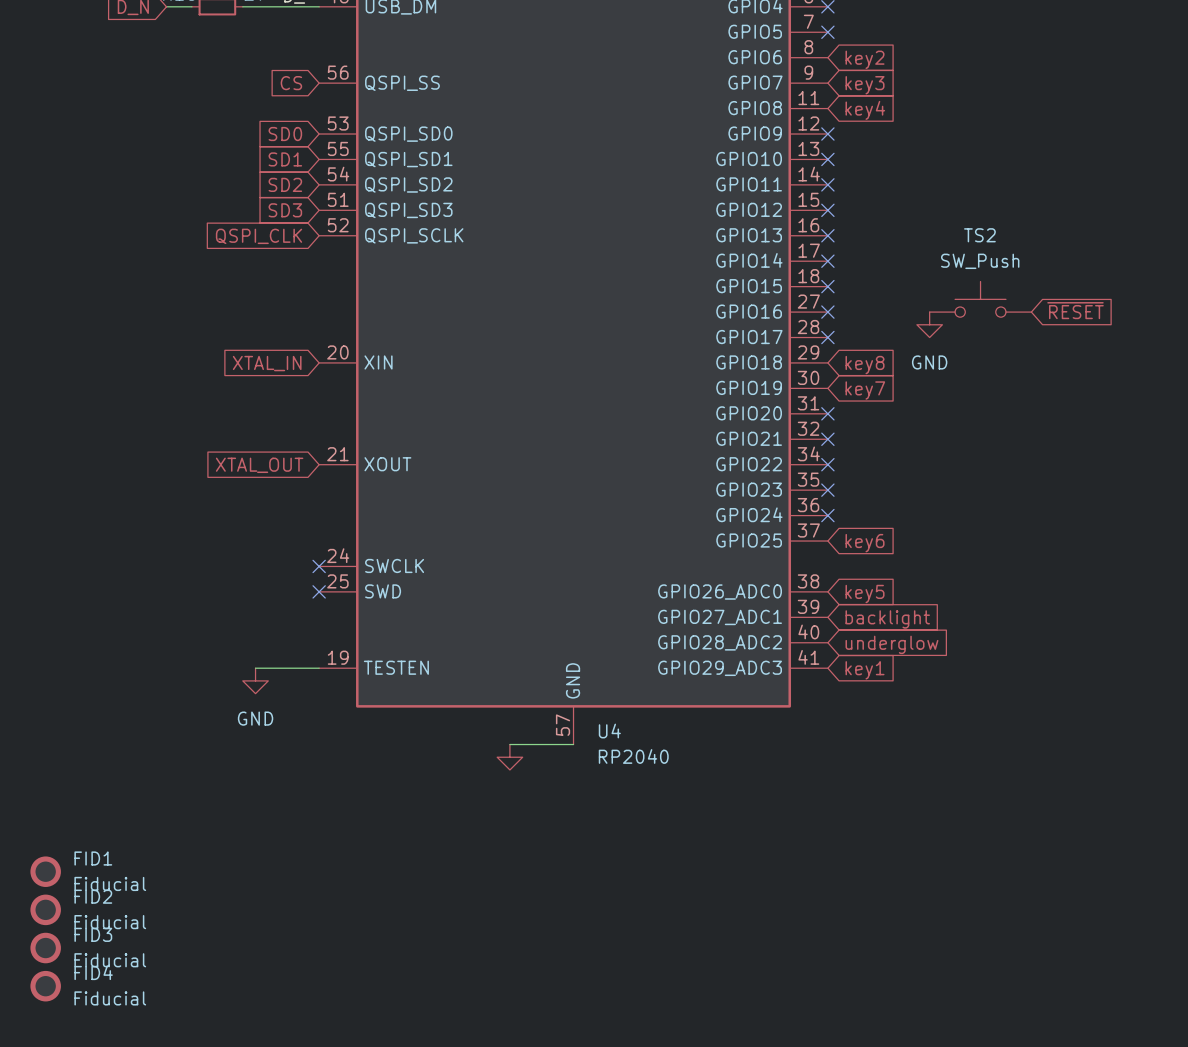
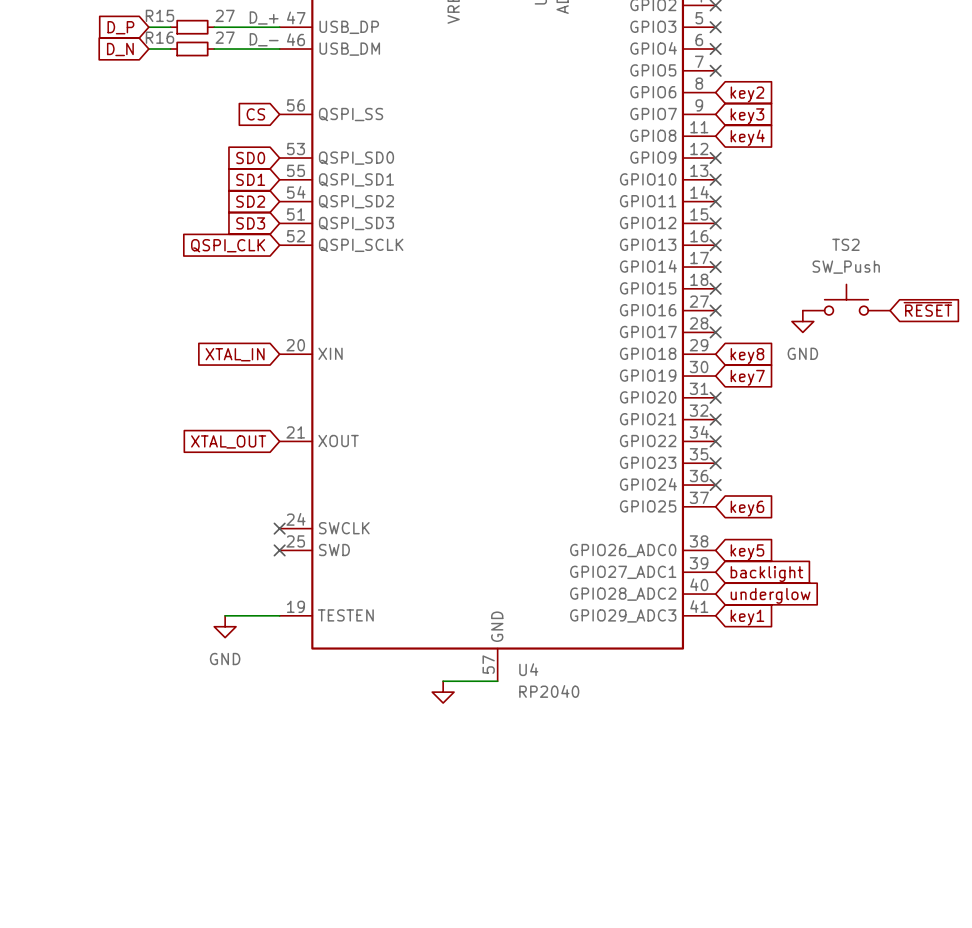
FID1: Fiducial (45, 871) -> none
FID2: Fiducial (45, 909) -> none
FID3: Fiducial (45, 948) -> none
FID4: Fiducial (45, 986) -> none

